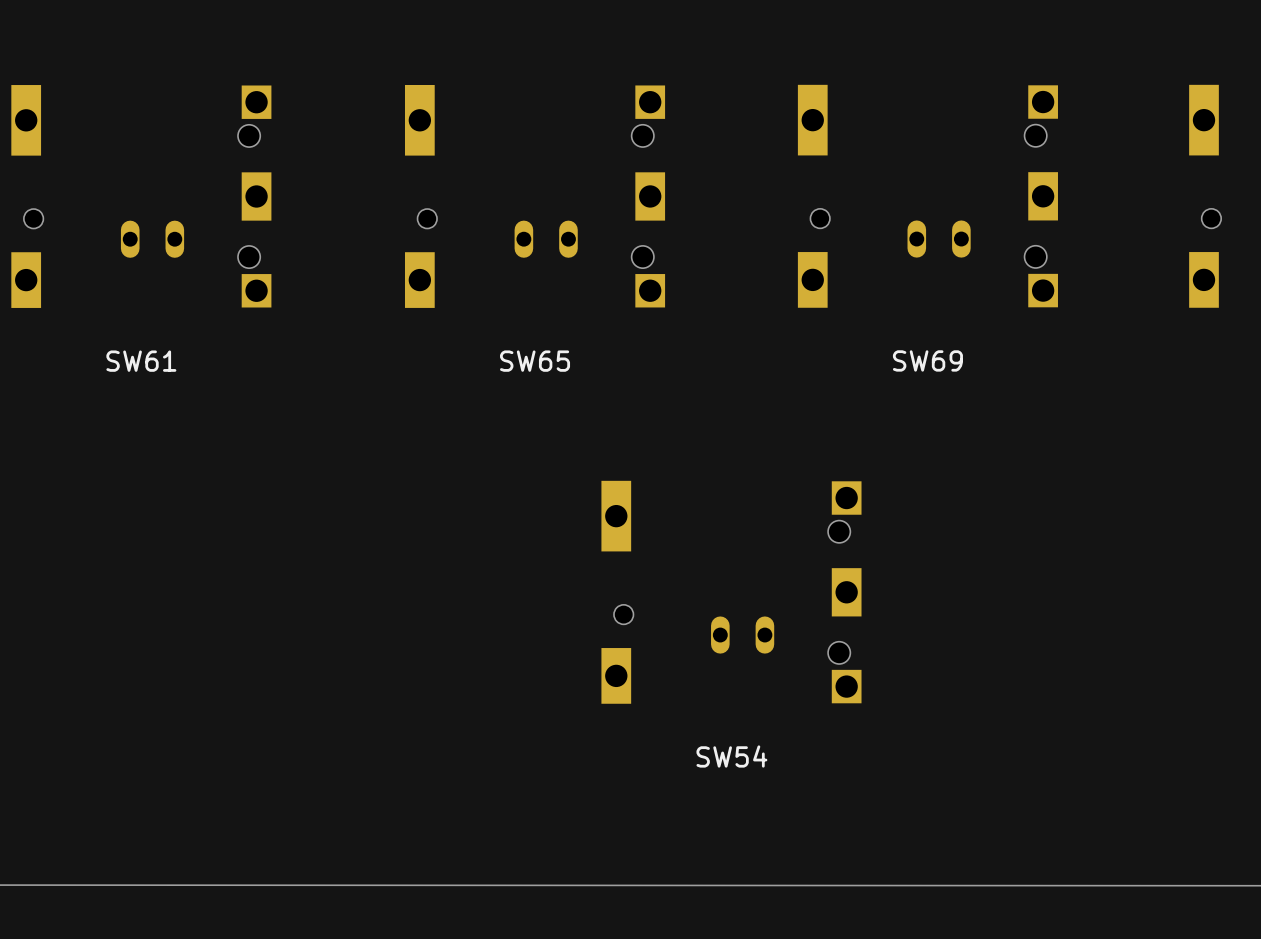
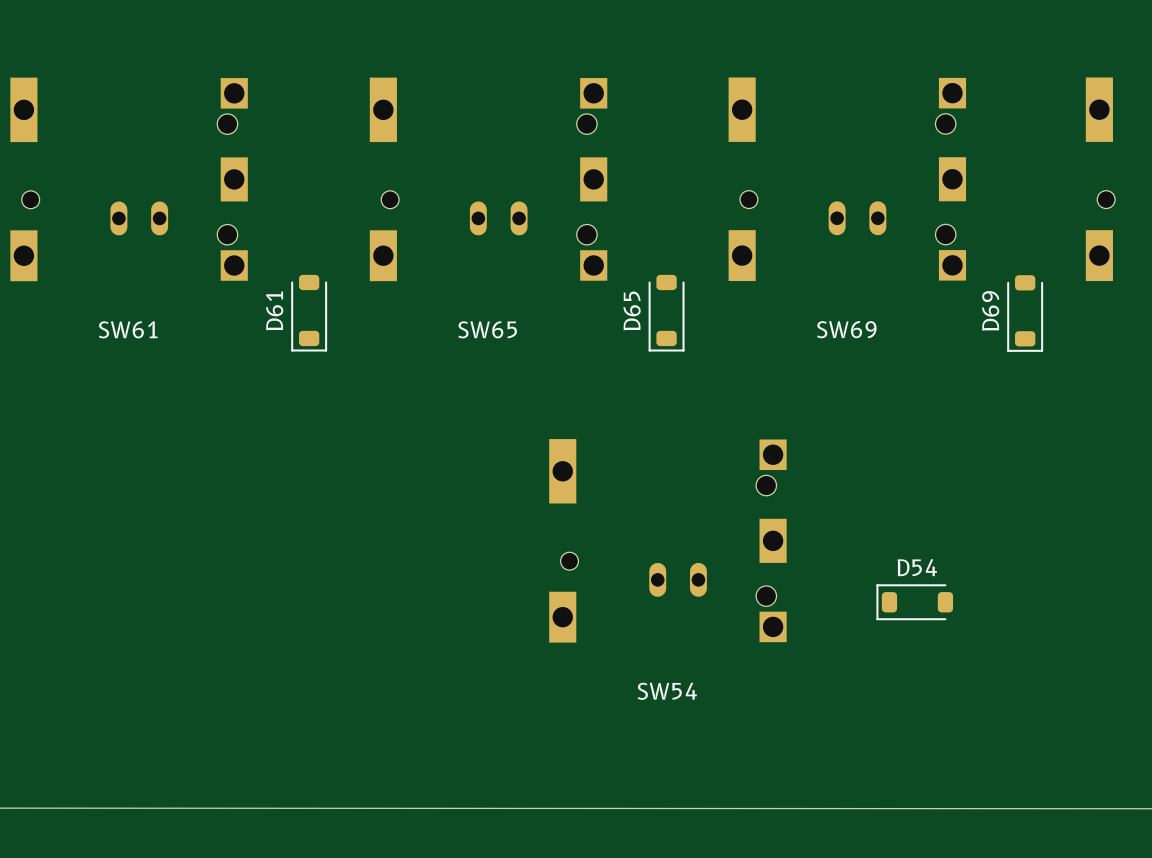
D61: none -> (309, 313)
D65: none -> (666, 313)
D69: none -> (1025, 313)
D54: none -> (914, 602)

